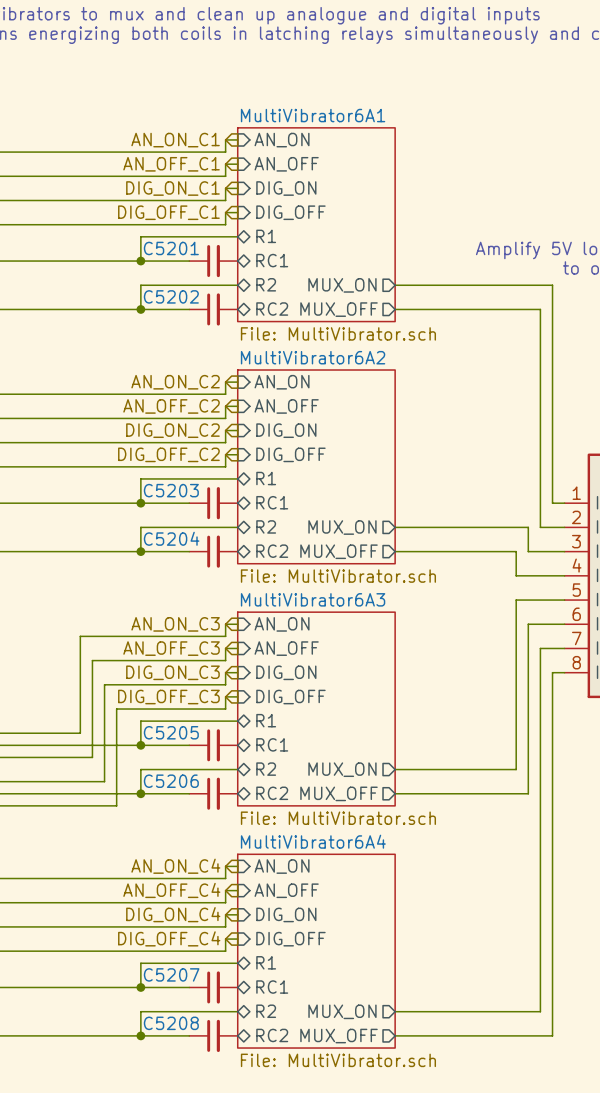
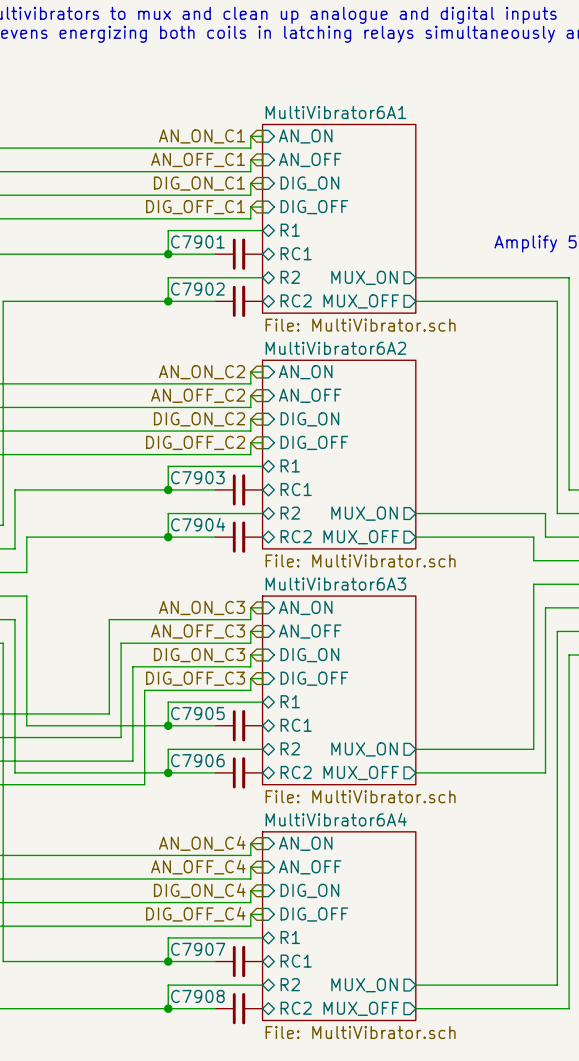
C5201 name: C5201 (171, 248) -> C7901 (197, 241)
C5202 name: C5202 (171, 296) -> C7902 (197, 289)
C5203 name: C5203 (171, 490) -> C7903 (197, 477)
C5204 name: C5204 (171, 538) -> C7904 (198, 524)
C5205 name: C5205 (171, 732) -> C7905 (197, 713)
C5206 name: C5206 (171, 781) -> C7906 (197, 760)
C5207 name: C5207 (171, 974) -> C7907 (198, 949)
C5208 name: C5208 (171, 1023) -> C7908 (197, 996)

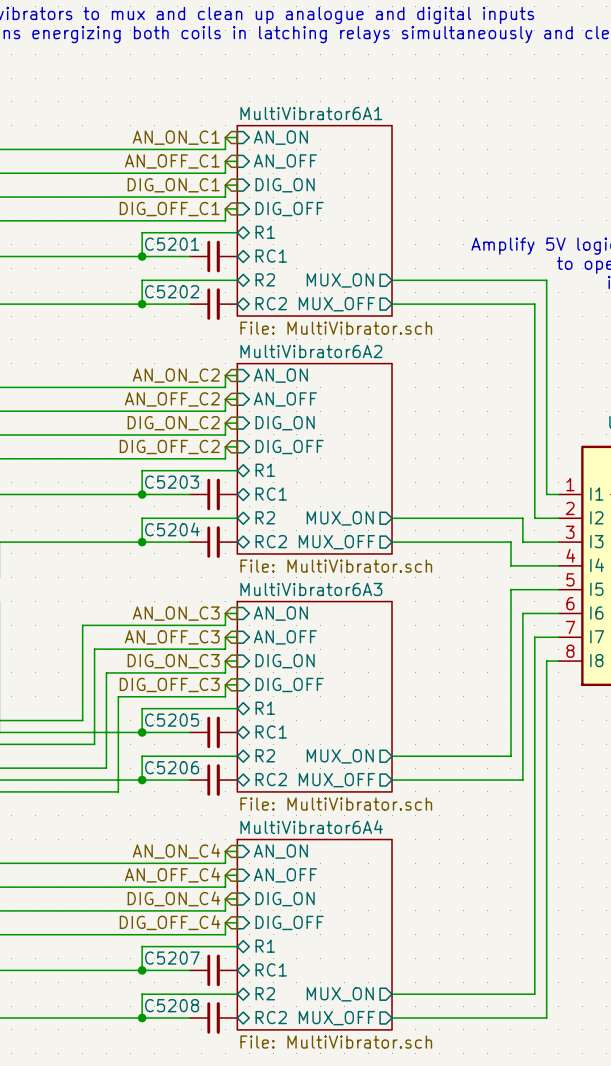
C7901 name: C7901 (197, 241) -> C5201 (172, 244)
C7902 name: C7902 (197, 289) -> C5202 (172, 291)
C7903 name: C7903 (197, 477) -> C5203 (172, 482)
C7904 name: C7904 (198, 524) -> C5204 (172, 529)
C7905 name: C7905 (197, 713) -> C5205 (172, 720)
C7906 name: C7906 (197, 760) -> C5206 (172, 767)
C7907 name: C7907 (198, 949) -> C5207 (172, 958)
C7908 name: C7908 (197, 996) -> C5208 (172, 1005)

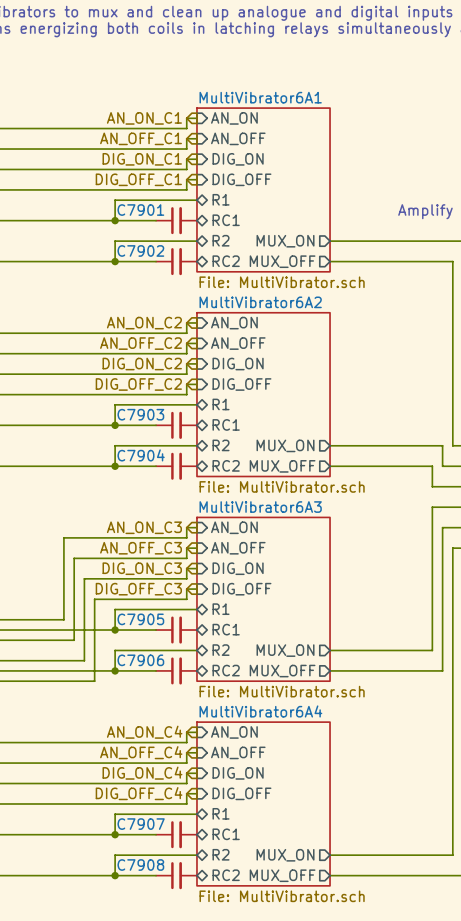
C5201 name: C5201 (172, 244) -> C7901 (140, 210)
C5202 name: C5202 (172, 291) -> C7902 (140, 250)
C5203 name: C5203 (172, 482) -> C7903 (140, 414)
C5204 name: C5204 (172, 529) -> C7904 (141, 455)
C5205 name: C5205 (172, 720) -> C7905 (140, 619)
C5206 name: C5206 (172, 767) -> C7906 (140, 660)
C5207 name: C5207 (172, 958) -> C7907 (141, 824)
C5208 name: C5208 (172, 1005) -> C7908 (140, 865)

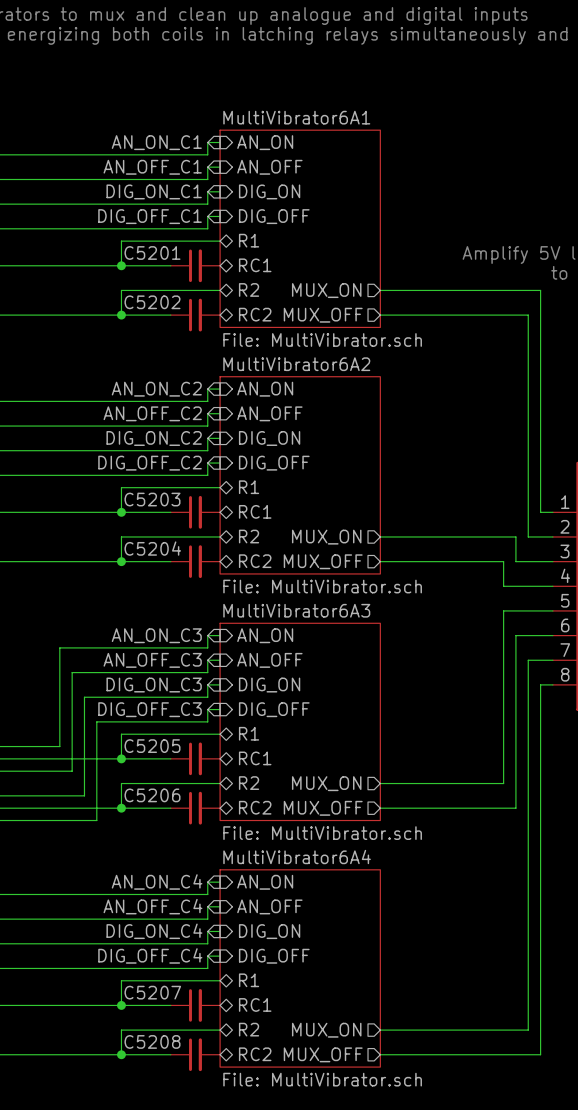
C7901 name: C7901 (140, 210) -> C5201 (152, 252)
C7902 name: C7902 (140, 250) -> C5202 (152, 302)
C7903 name: C7903 (140, 414) -> C5203 (152, 499)
C7904 name: C7904 (141, 455) -> C5204 (152, 548)
C7905 name: C7905 (140, 619) -> C5205 (152, 746)
C7906 name: C7906 (140, 660) -> C5206 (152, 795)
C7907 name: C7907 (141, 824) -> C5207 (152, 992)
C7908 name: C7908 (140, 865) -> C5208 (152, 1041)

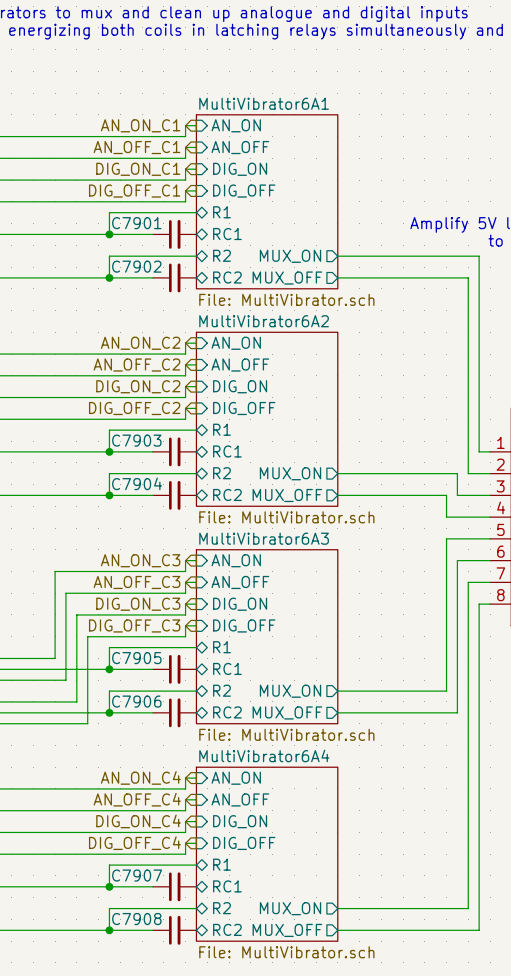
C5201 name: C5201 (152, 252) -> C7901 (136, 223)
C5202 name: C5202 (152, 302) -> C7902 (136, 266)
C5203 name: C5203 (152, 499) -> C7903 (136, 440)
C5204 name: C5204 (152, 548) -> C7904 (137, 483)
C5205 name: C5205 (152, 746) -> C7905 (136, 658)
C5206 name: C5206 (152, 795) -> C7906 (136, 701)
C5207 name: C5207 (152, 992) -> C7907 (137, 875)
C5208 name: C5208 (152, 1041) -> C7908 (136, 919)

